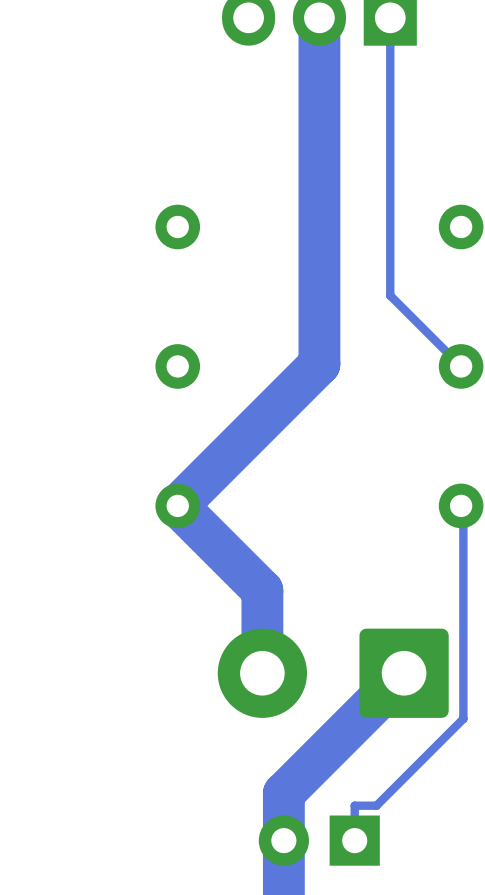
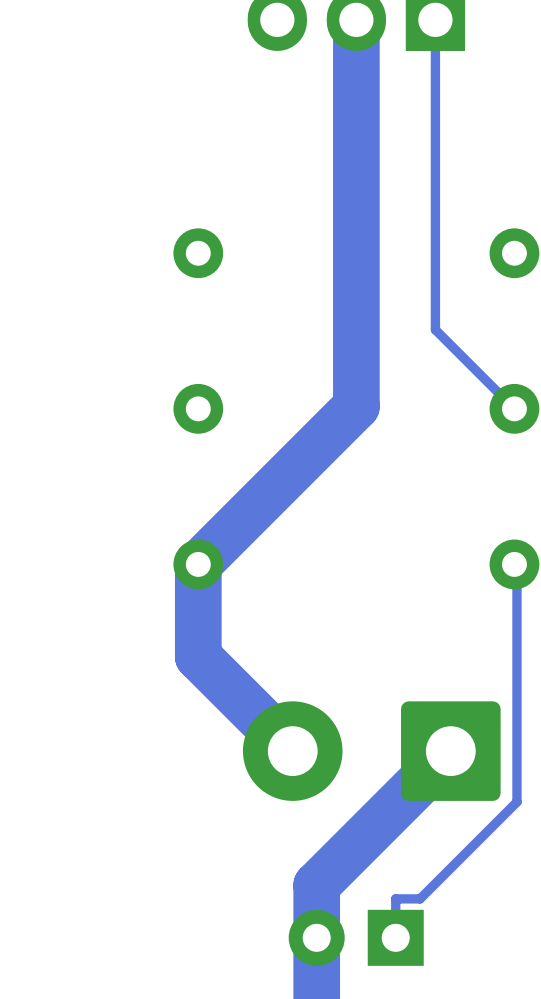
track: (177, 505) (262, 590) (262, 673) -> (198, 564) (198, 656) (292, 751)

